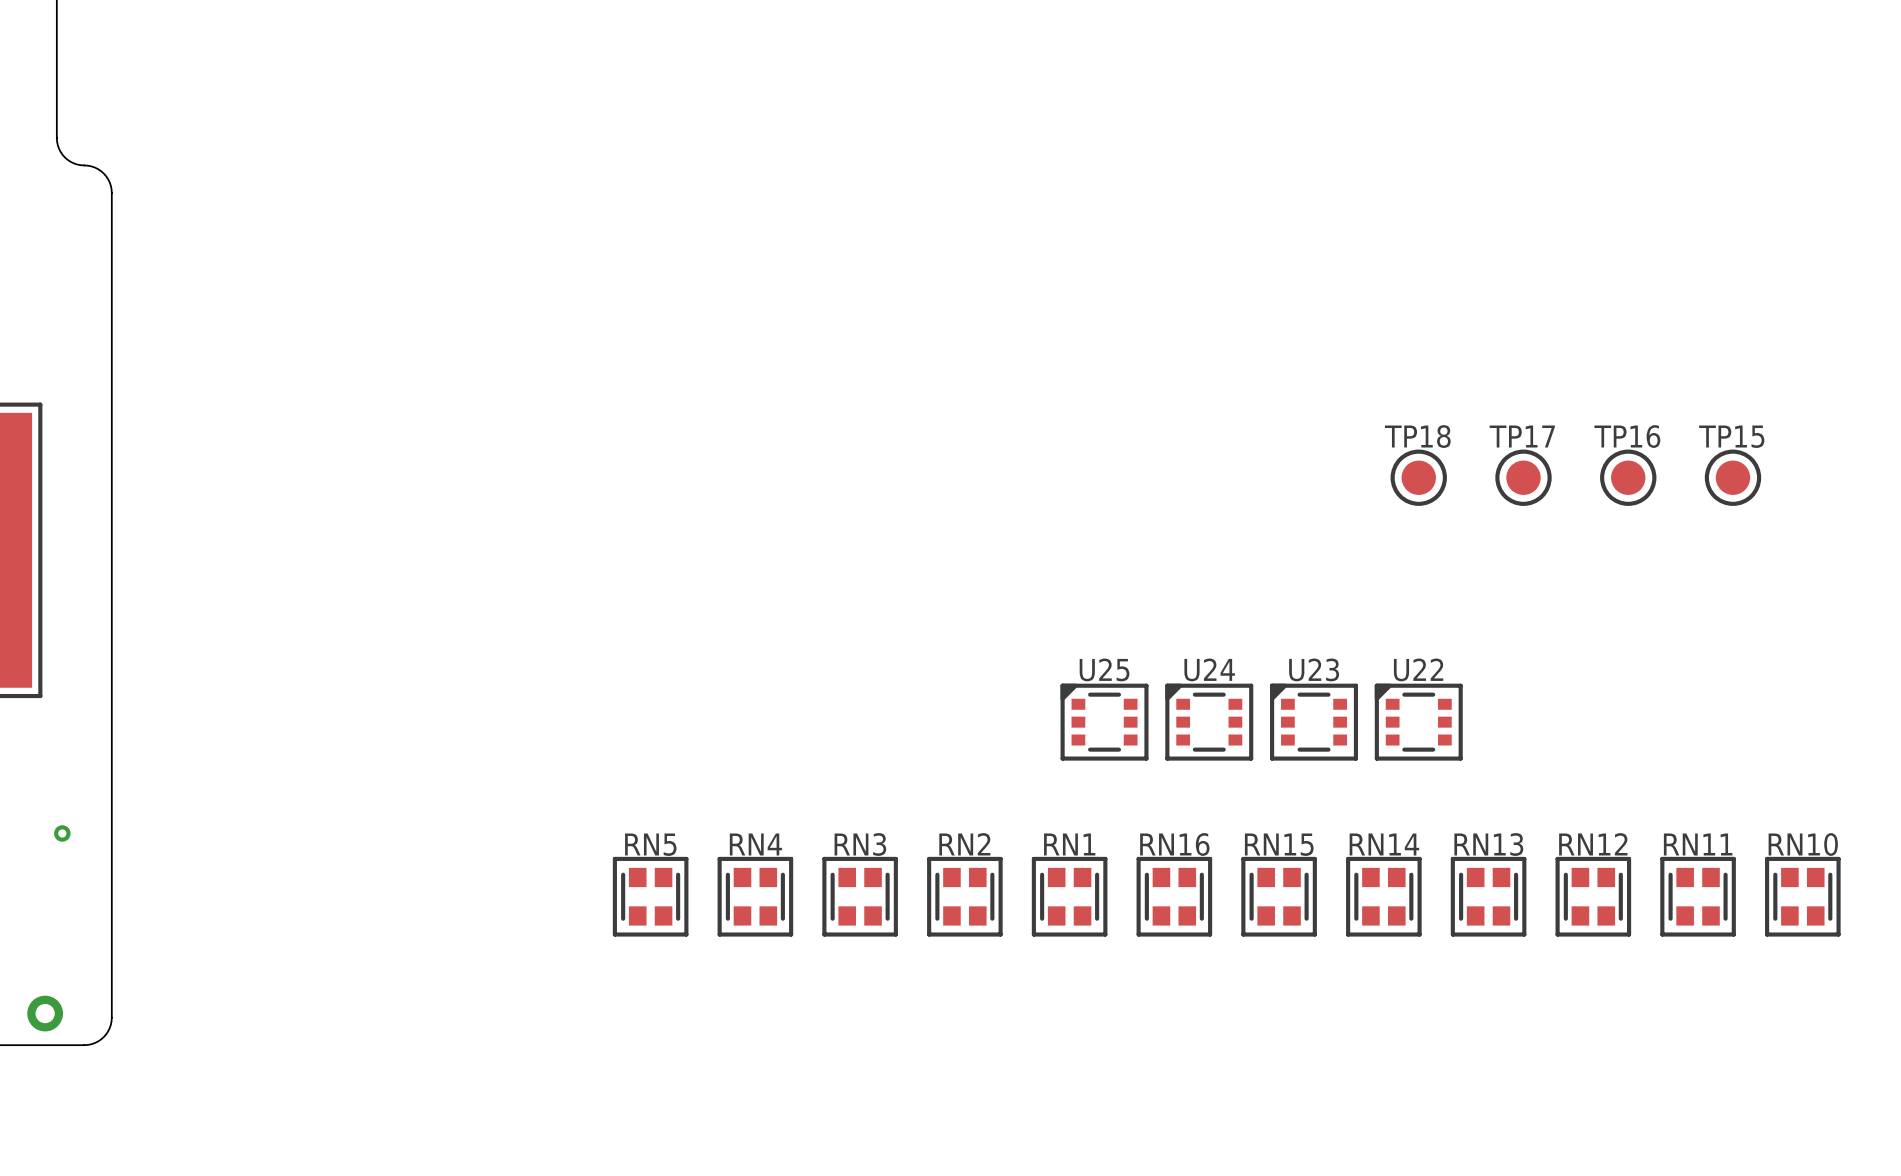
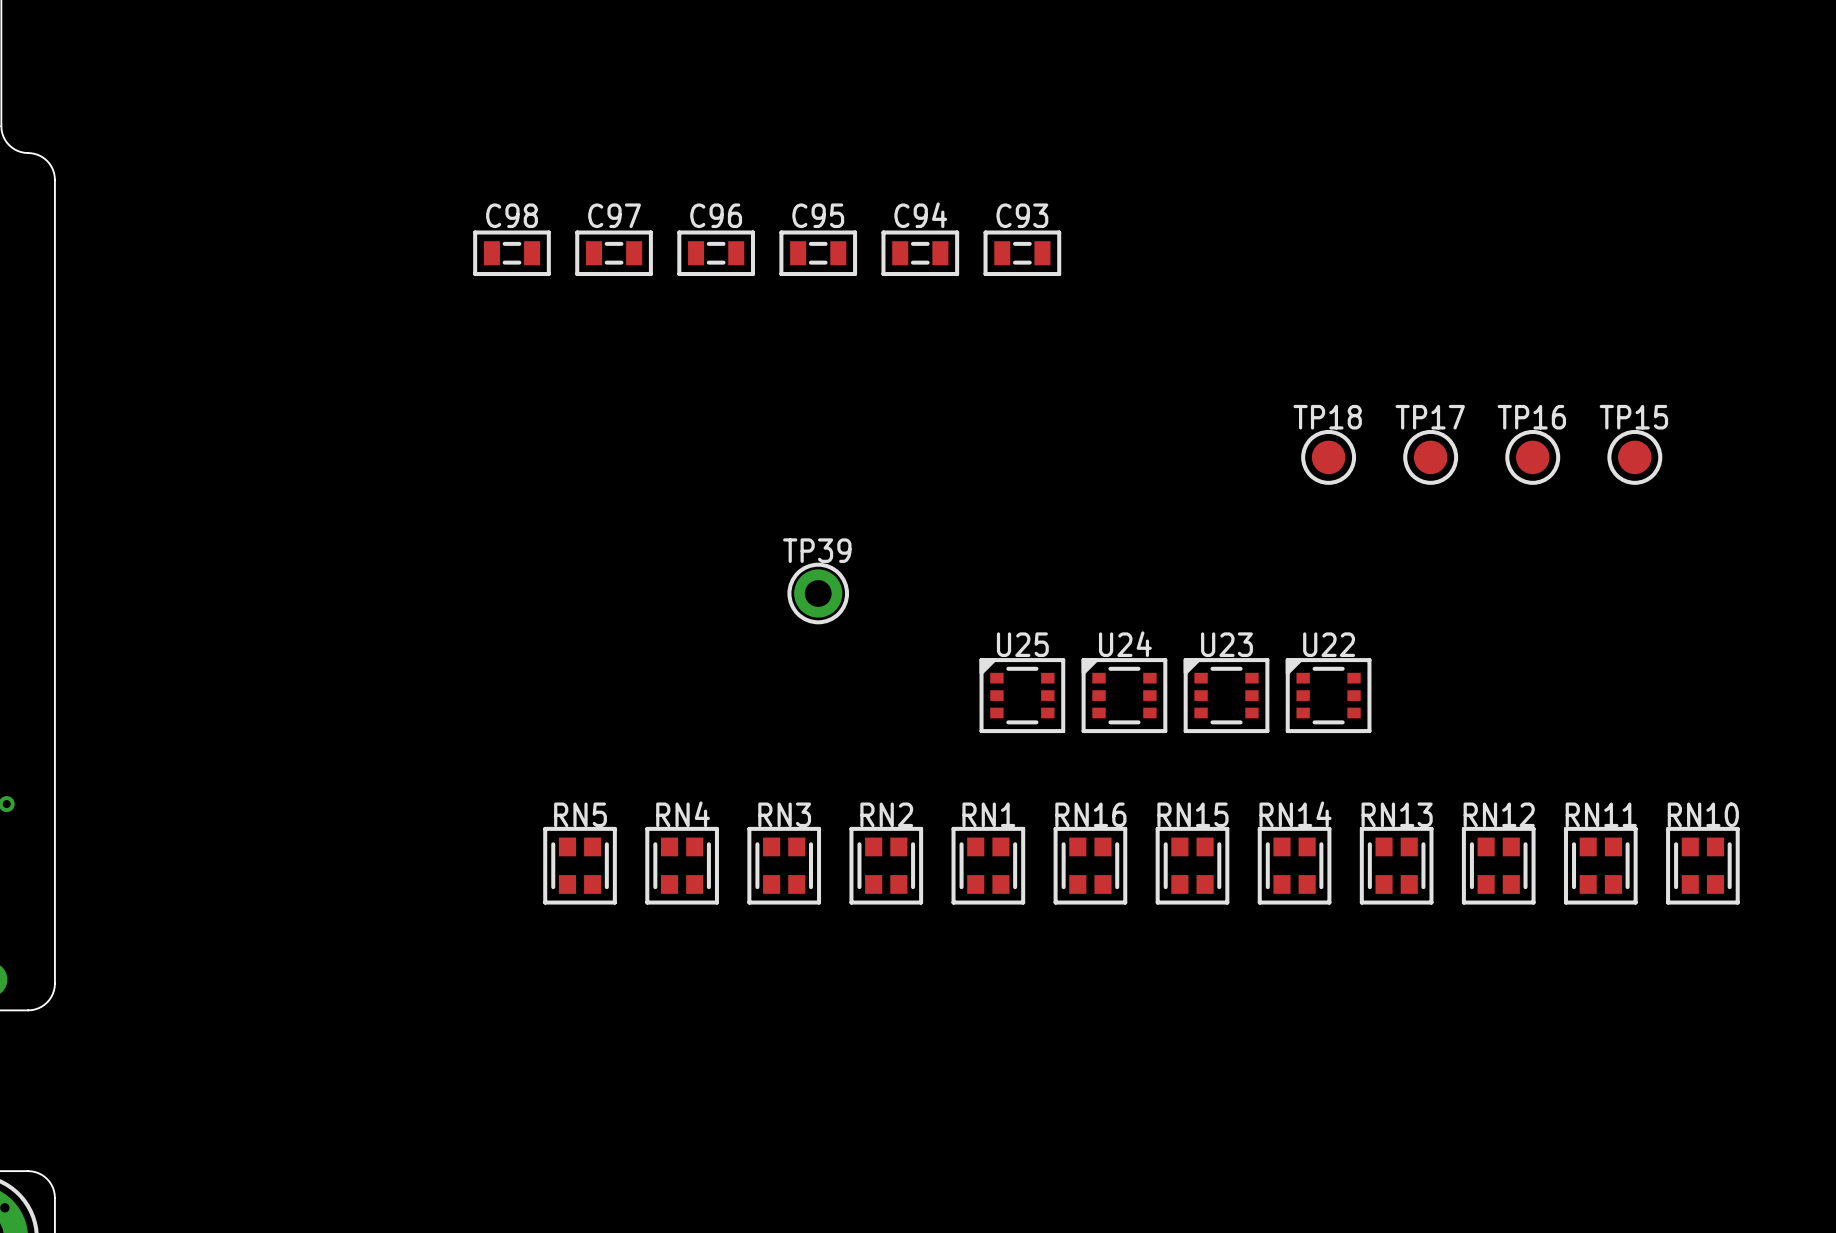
C98: none -> (512, 253)
C97: none -> (614, 253)
C96: none -> (716, 253)
C95: none -> (818, 253)
C94: none -> (920, 253)
C93: none -> (1022, 253)
TP39: none -> (818, 593)

